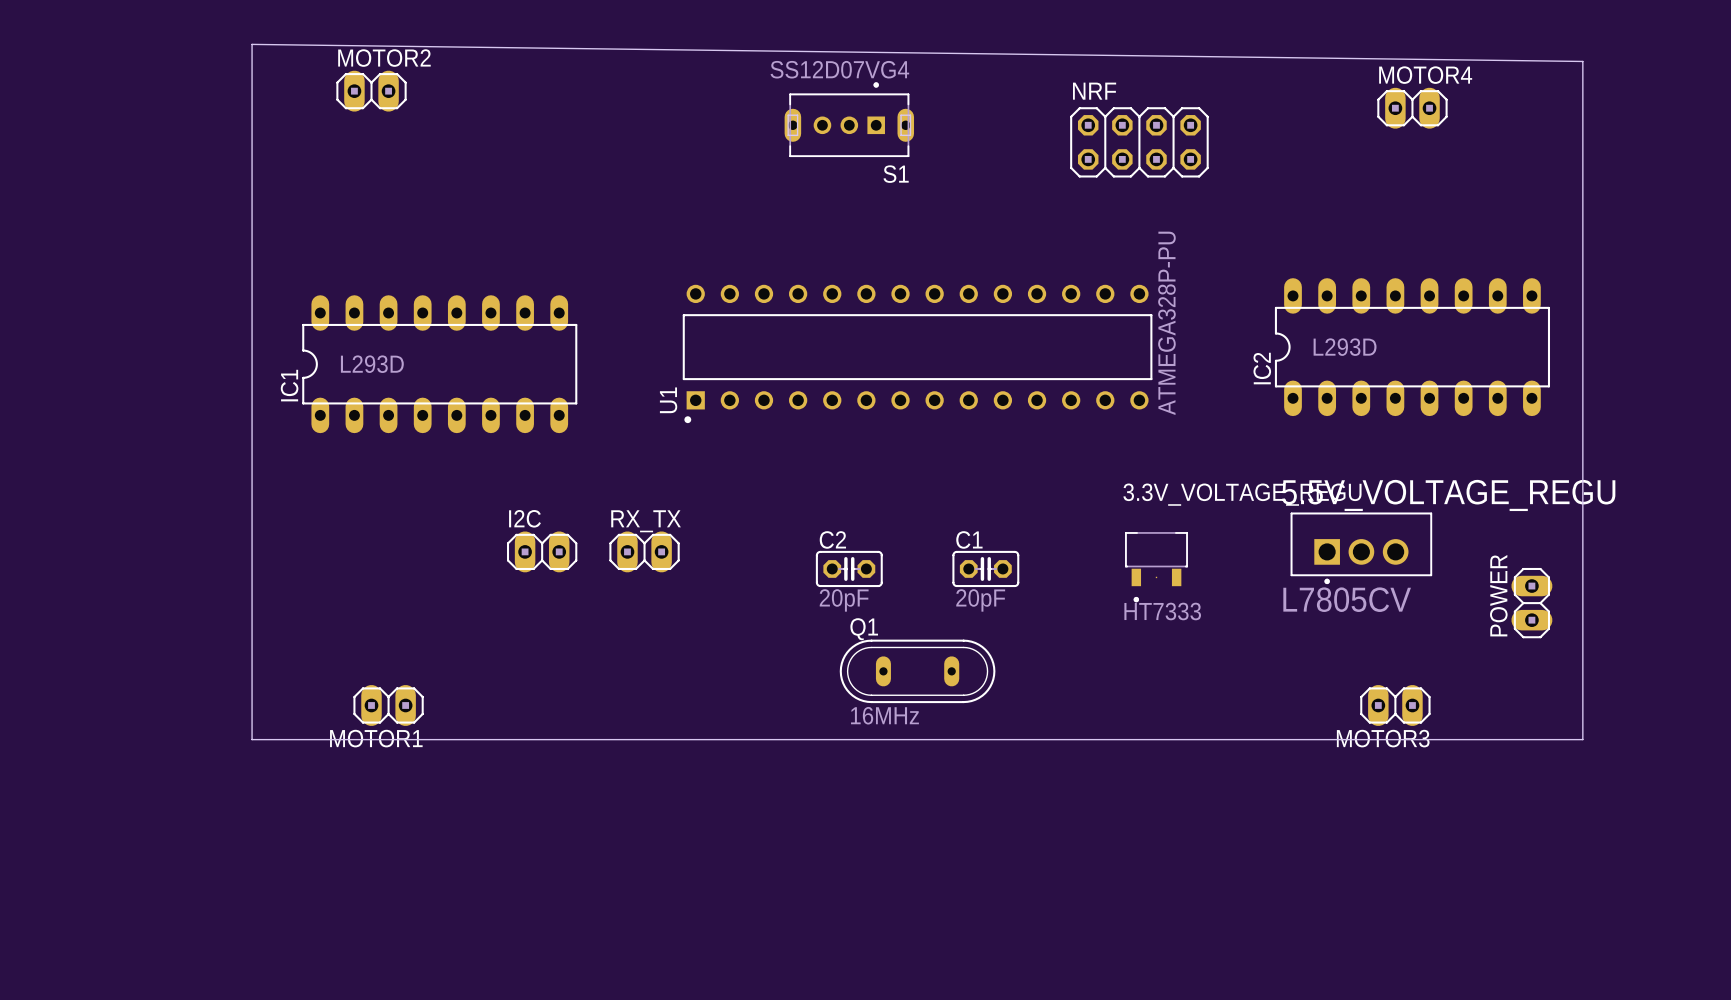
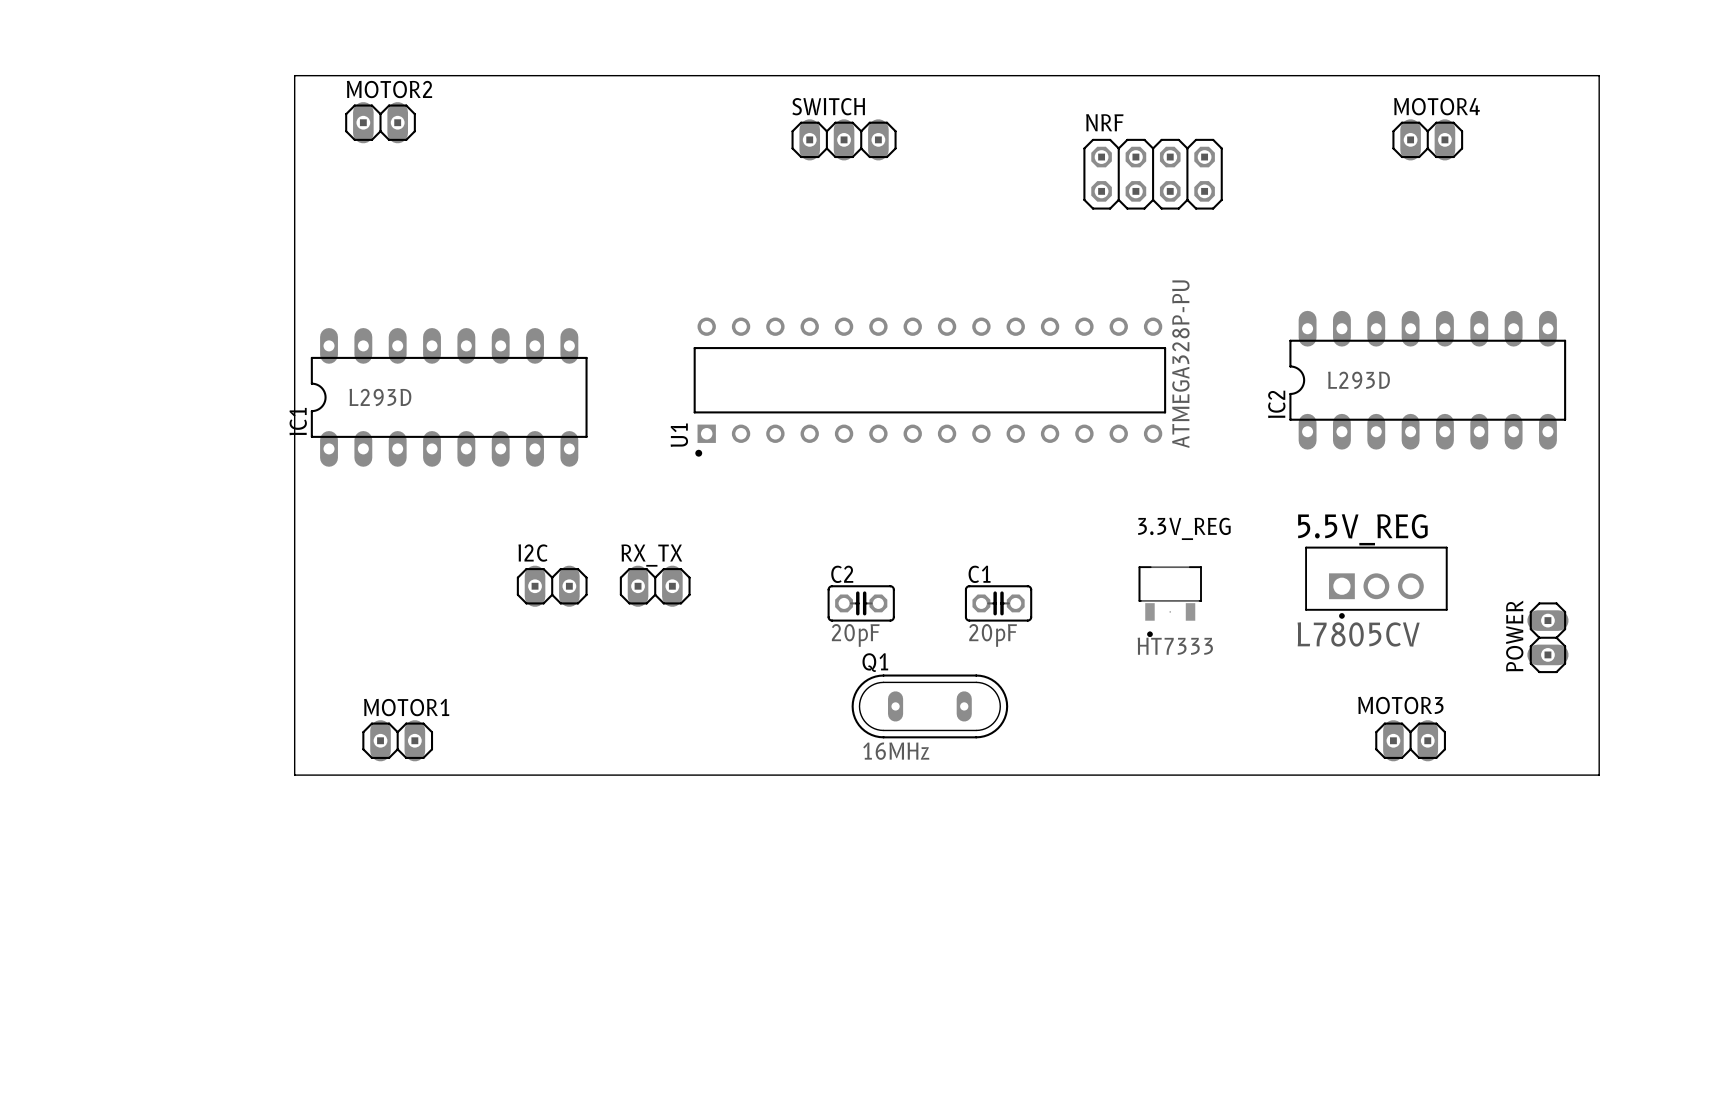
board edge: (1582, 61) (252, 44) (252, 739) (286, 739) -> (1599, 92) (1599, 75) (294, 75) (294, 775)
SWITCH: none -> (844, 139)
S1: SS12D07VG4 (849, 119) -> none
3.3V_VOLTAGE_REGU name: 3.3V_VOLTAGE_REGU (1242, 494) -> 3.3V_REG (1184, 528)
5.5V_VOLTAGE_REGU name: 5.5V_VOLTAGE_REGU (1448, 495) -> 5.5V_REG (1362, 529)
MOTOR1 name position: MOTOR1 (376, 738) -> MOTOR1 (406, 707)
MOTOR3 name position: MOTOR3 (1383, 738) -> MOTOR3 (1400, 705)

